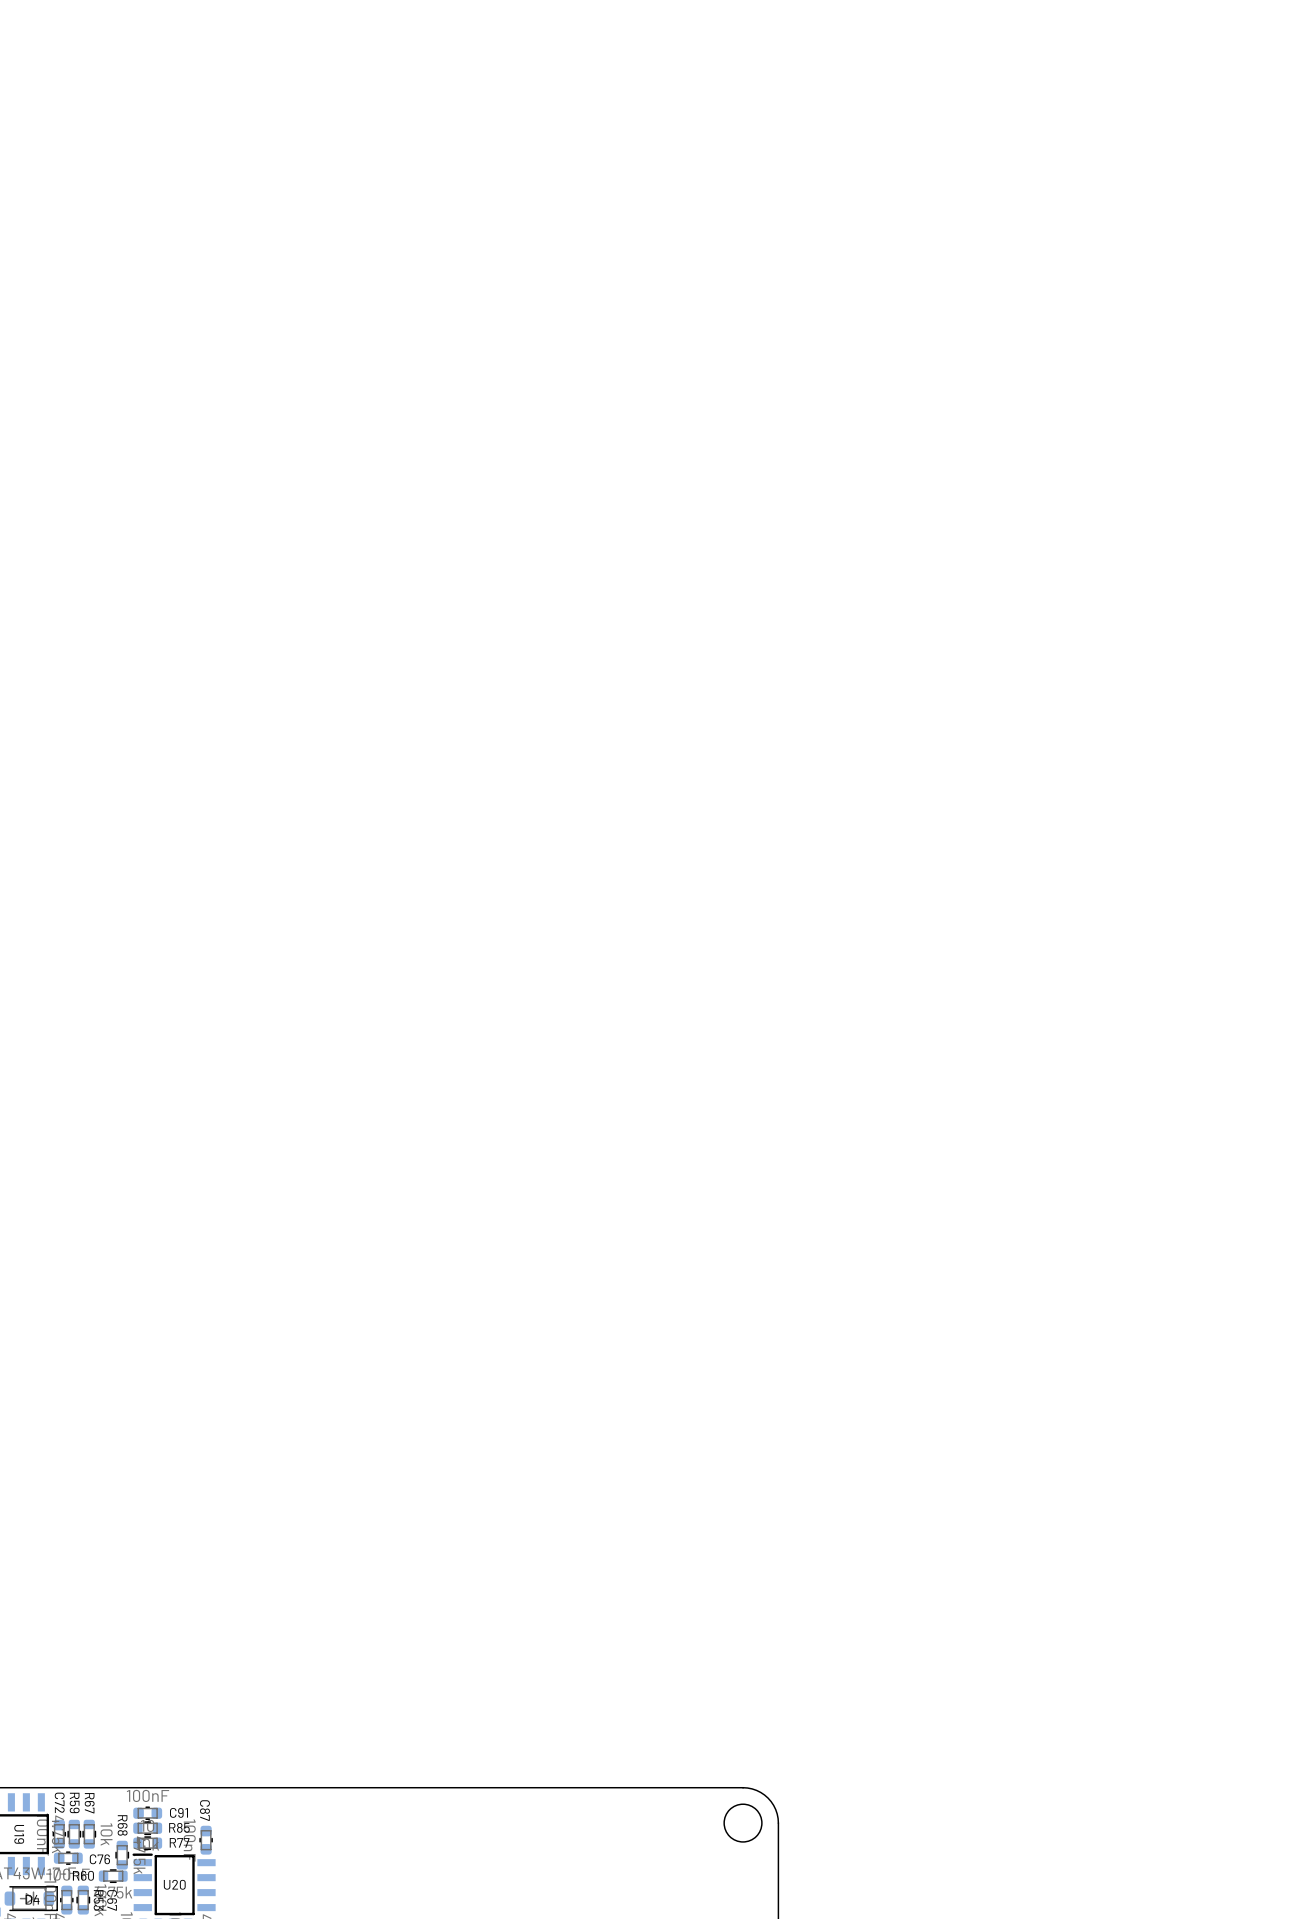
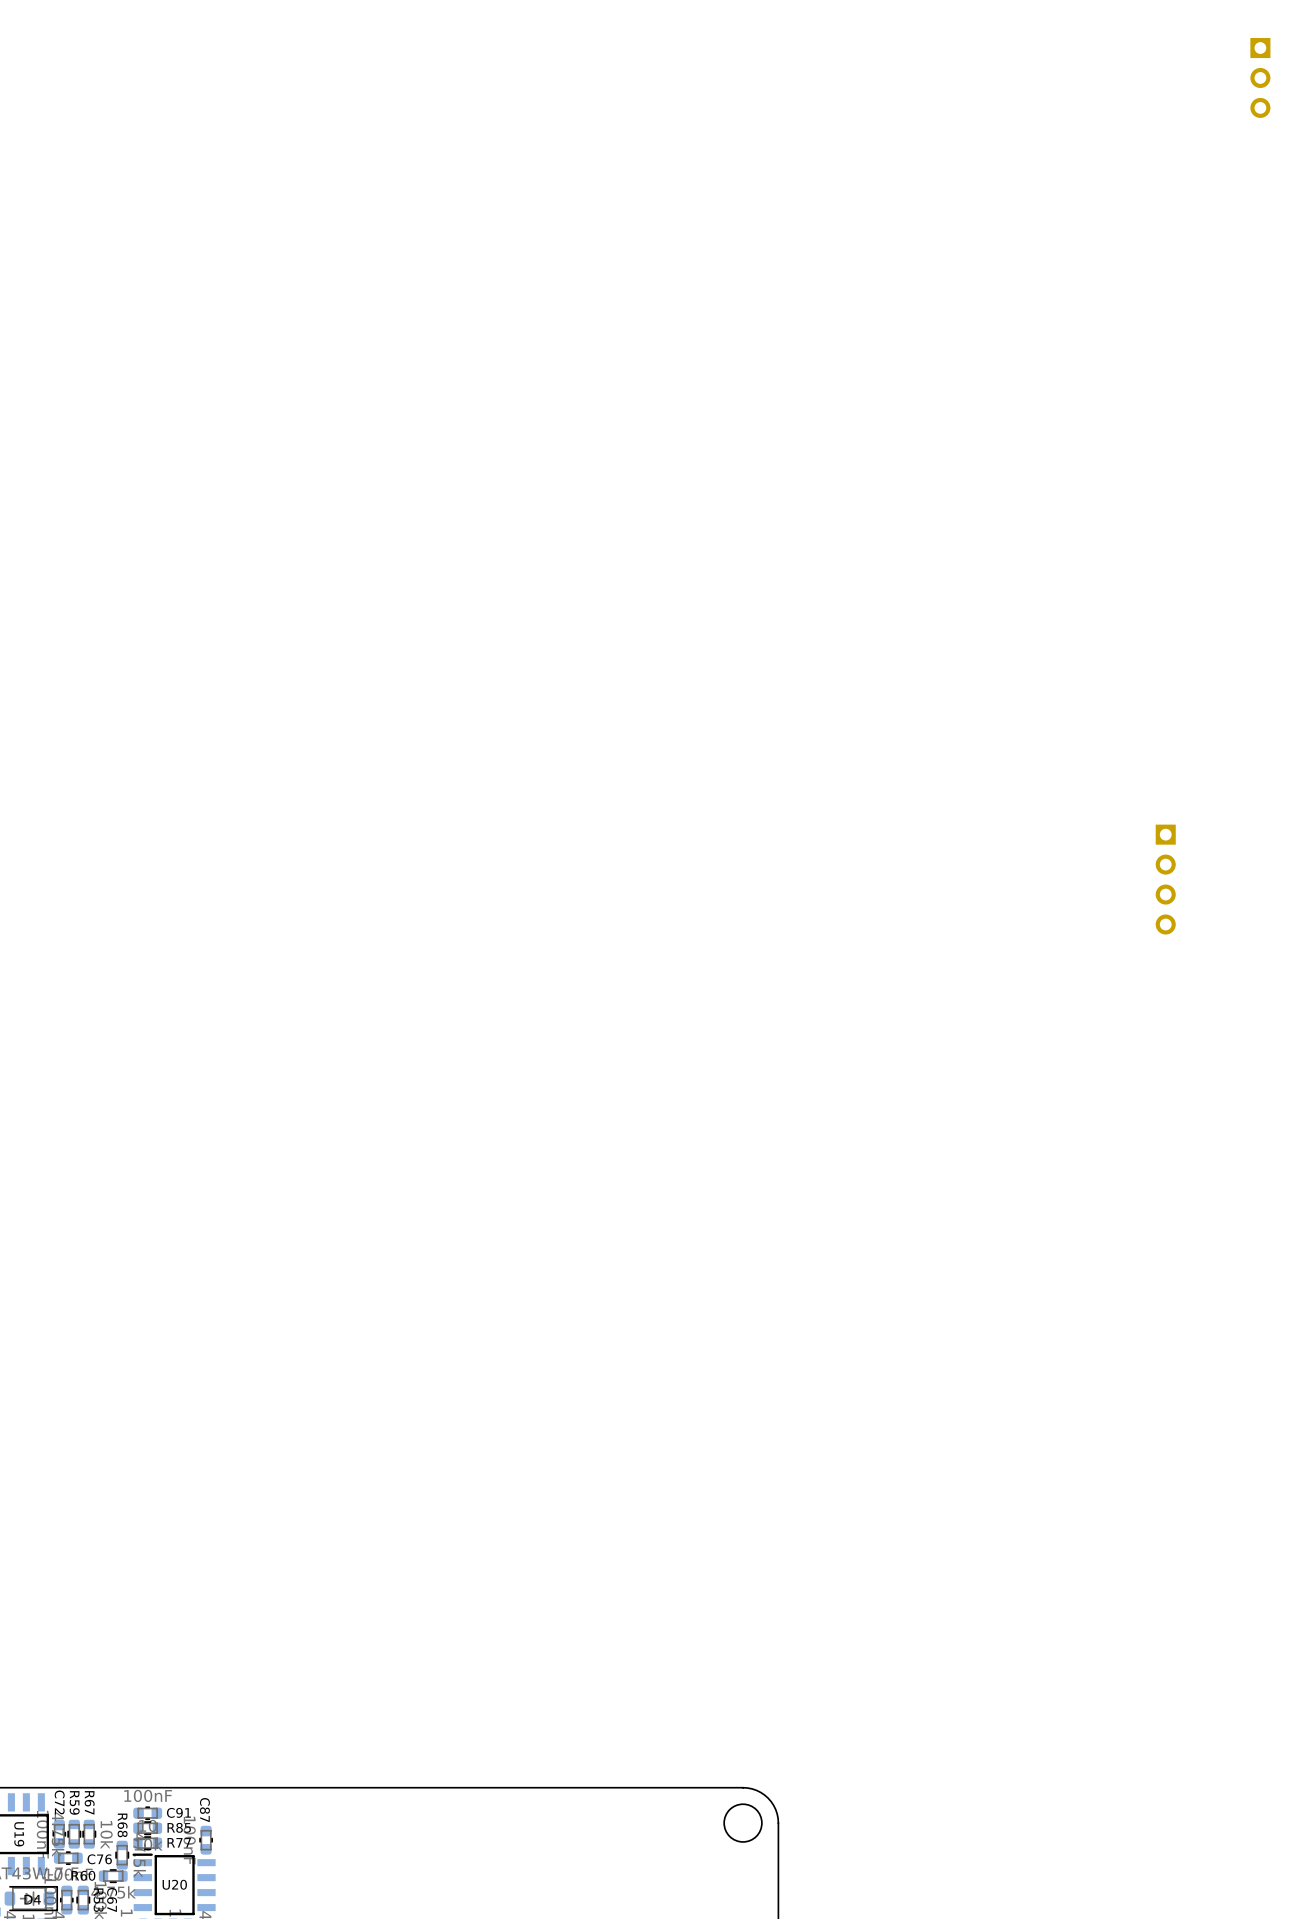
part: none -> (1260, 77)
part: none -> (1165, 879)

